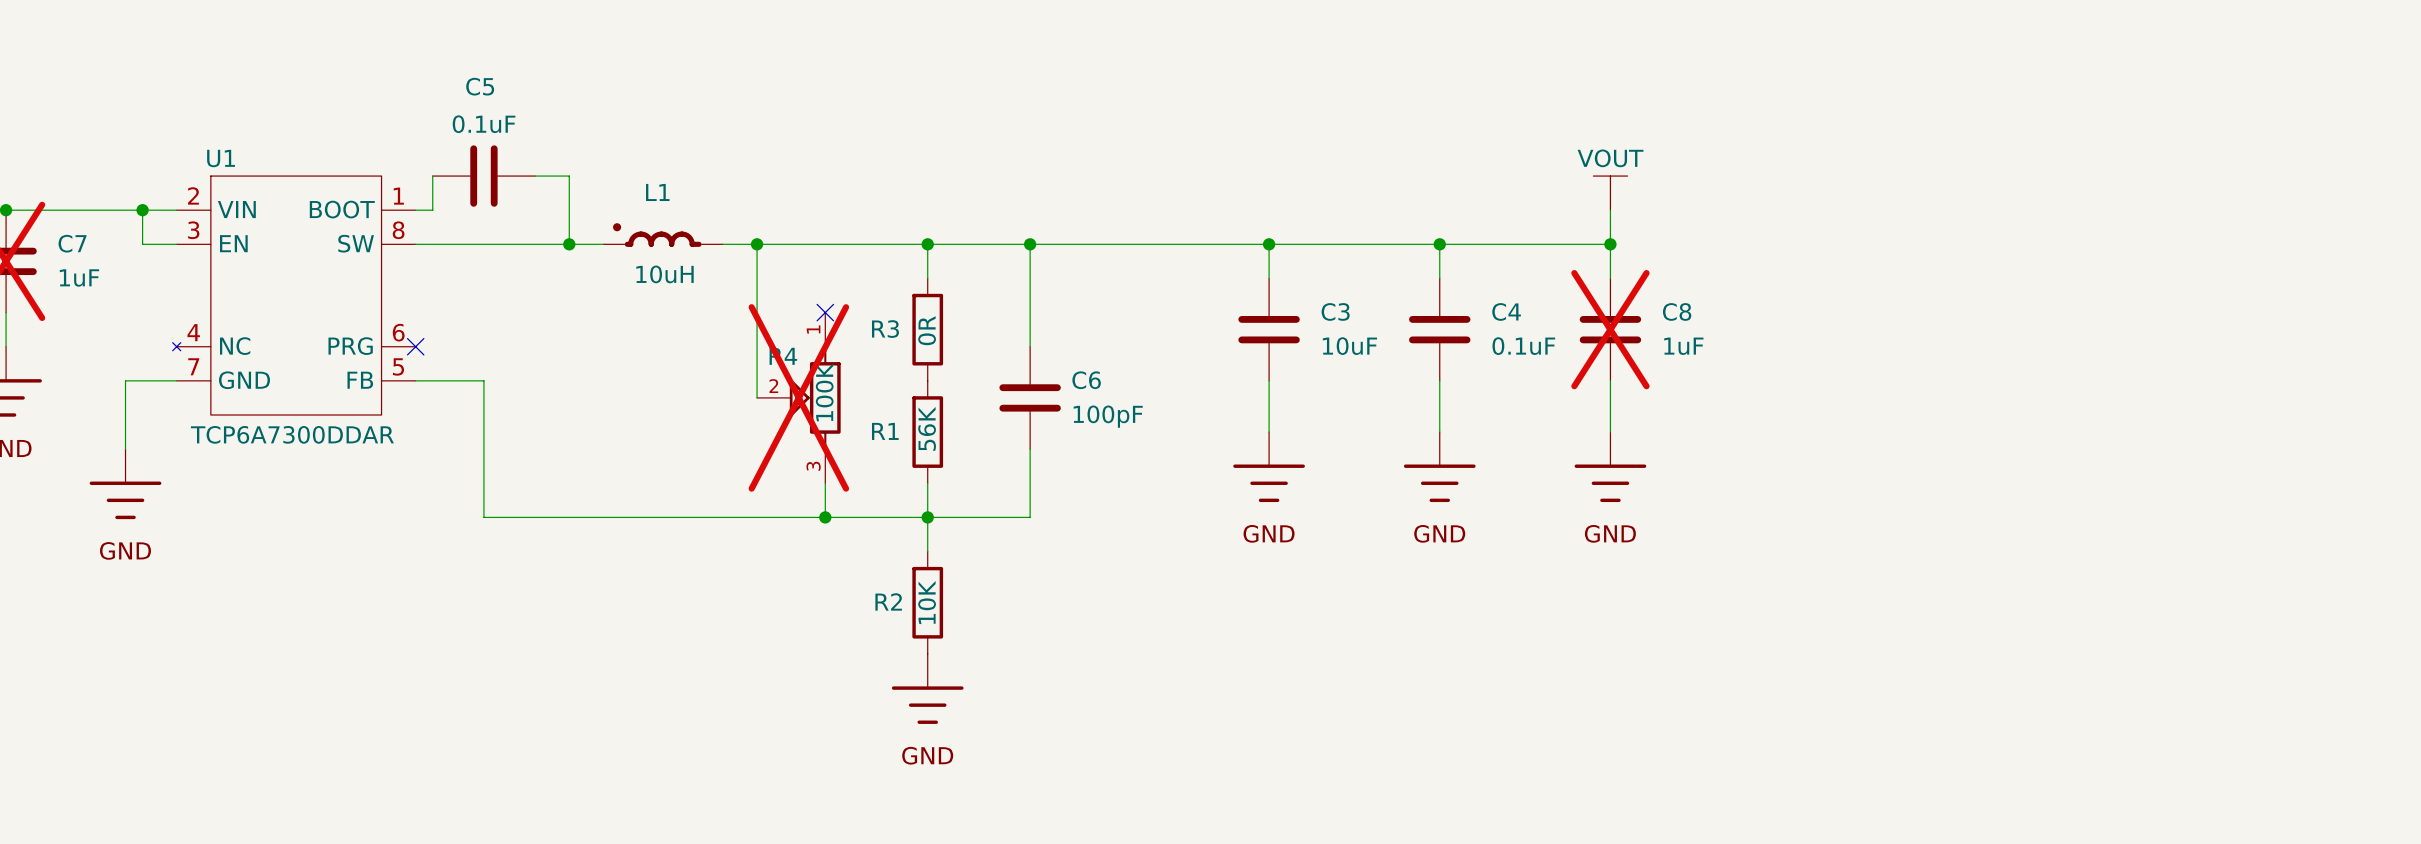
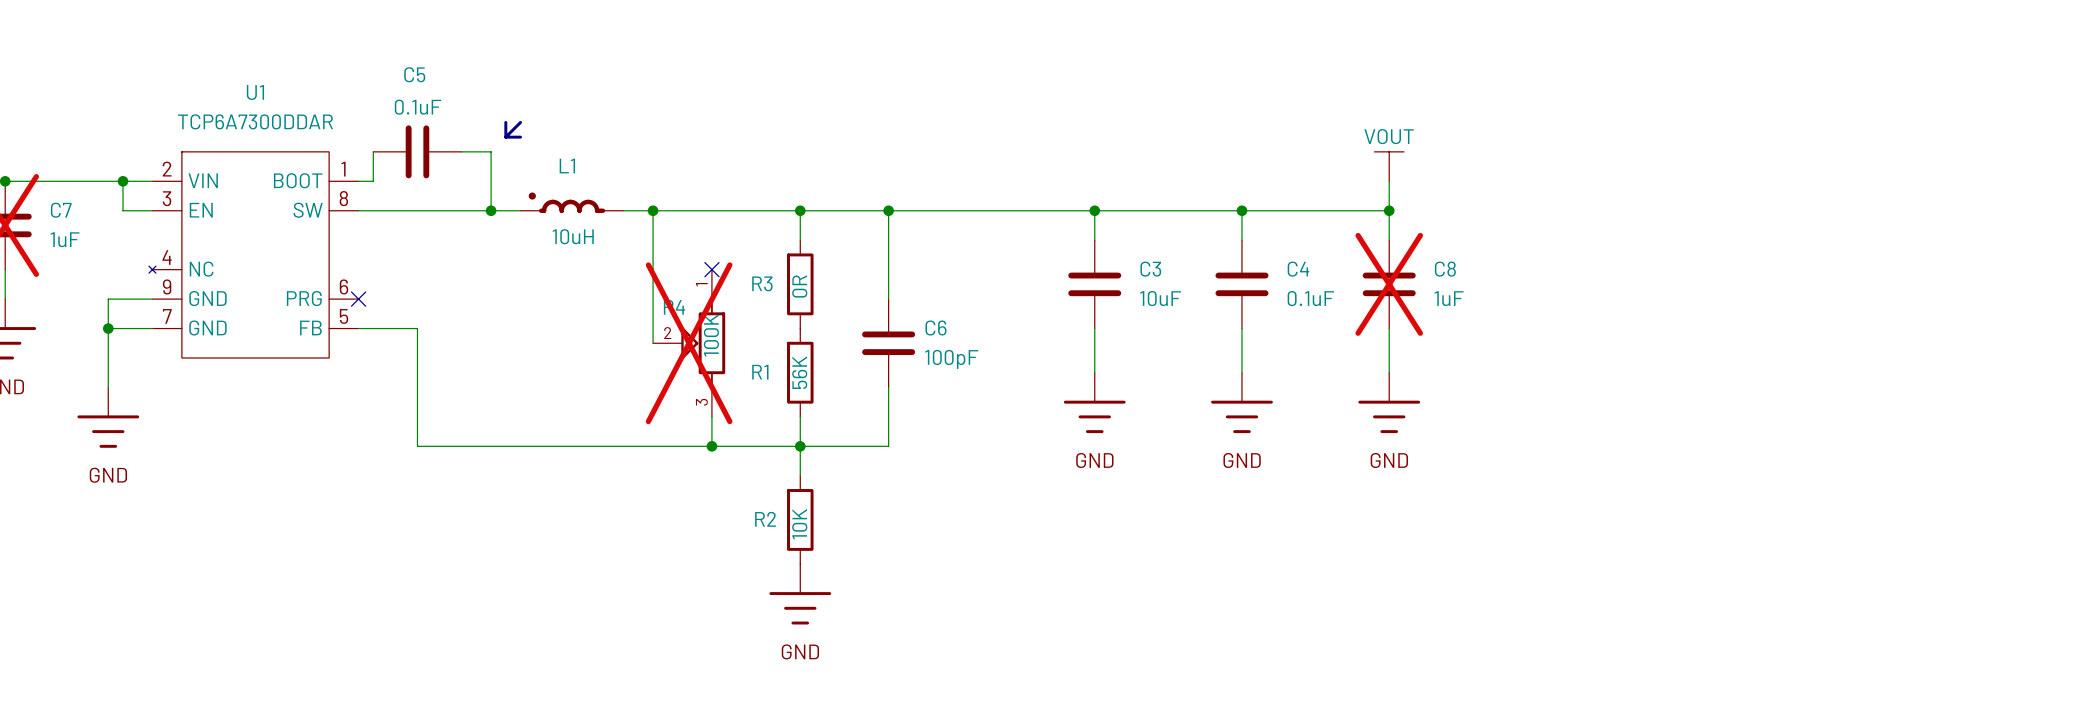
line: none -> (505, 122) (505, 137)
line: none -> (520, 122) (505, 137)
U1 name position: U1 (221, 158) -> U1 (255, 92)
line: none -> (505, 137) (520, 137)
U1 symbol: [172, 176, 416, 416] -> [148, 151, 359, 358]
wire: none -> (152, 299) (108, 299) (108, 328)
junction: none -> (108, 328)
U1 value position: TCP6A7300DDAR (292, 434) -> TCP6A7300DDAR (255, 121)

